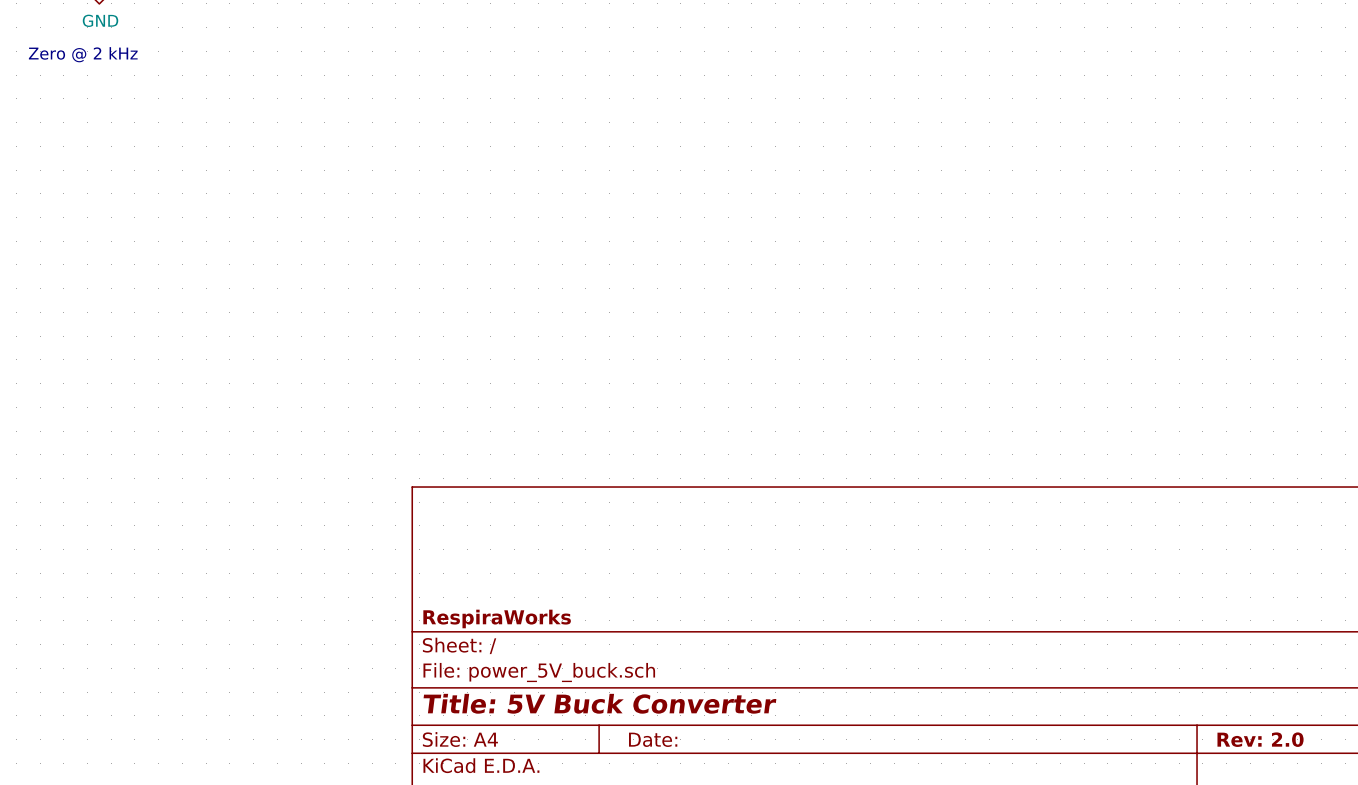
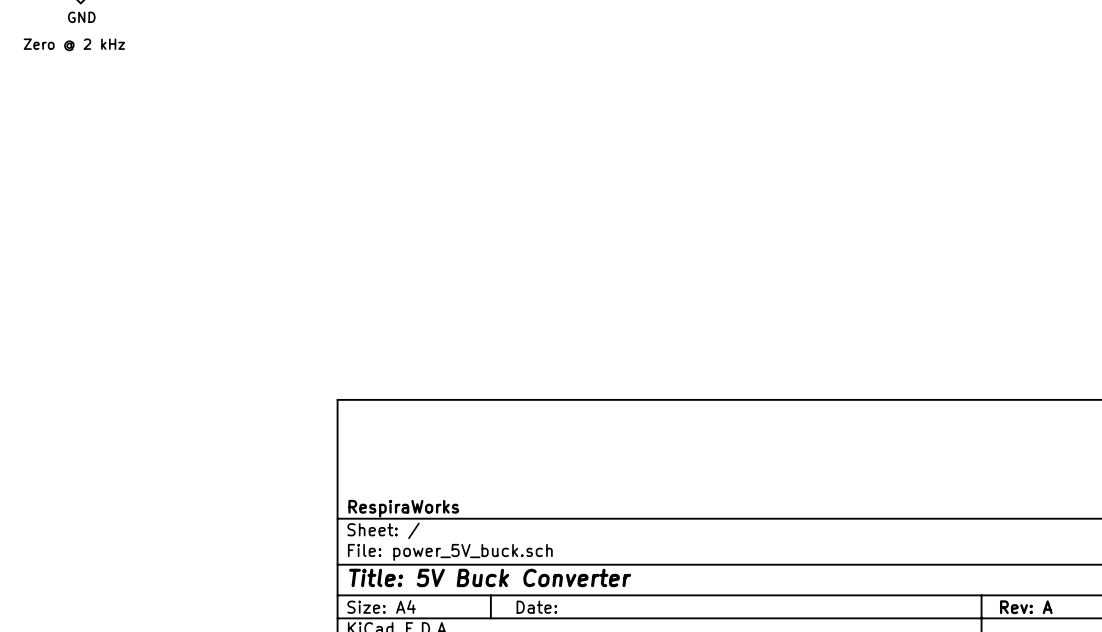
title block: Rev: 2.0 (1260, 739) -> Rev: A (1026, 607)

